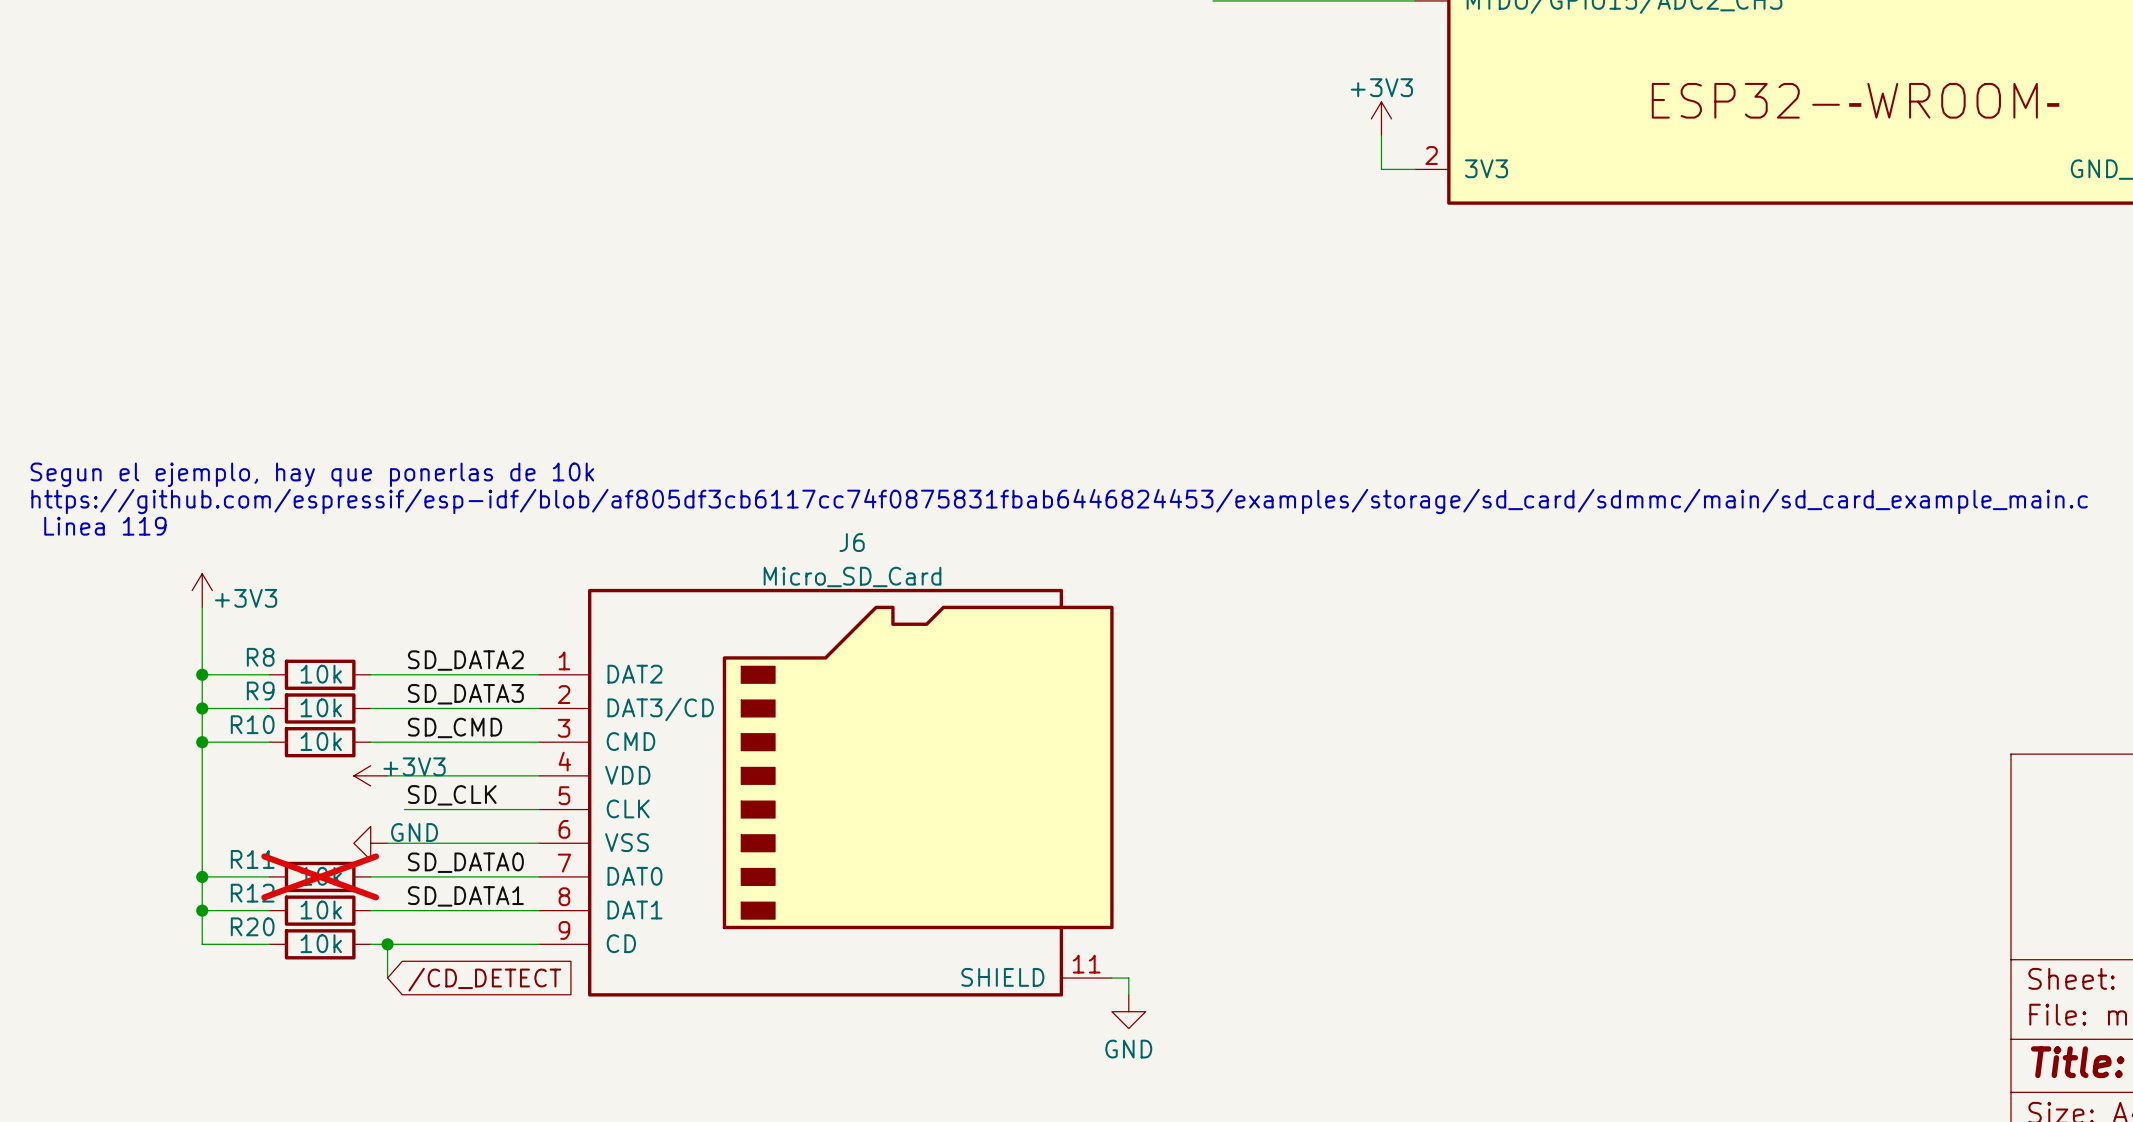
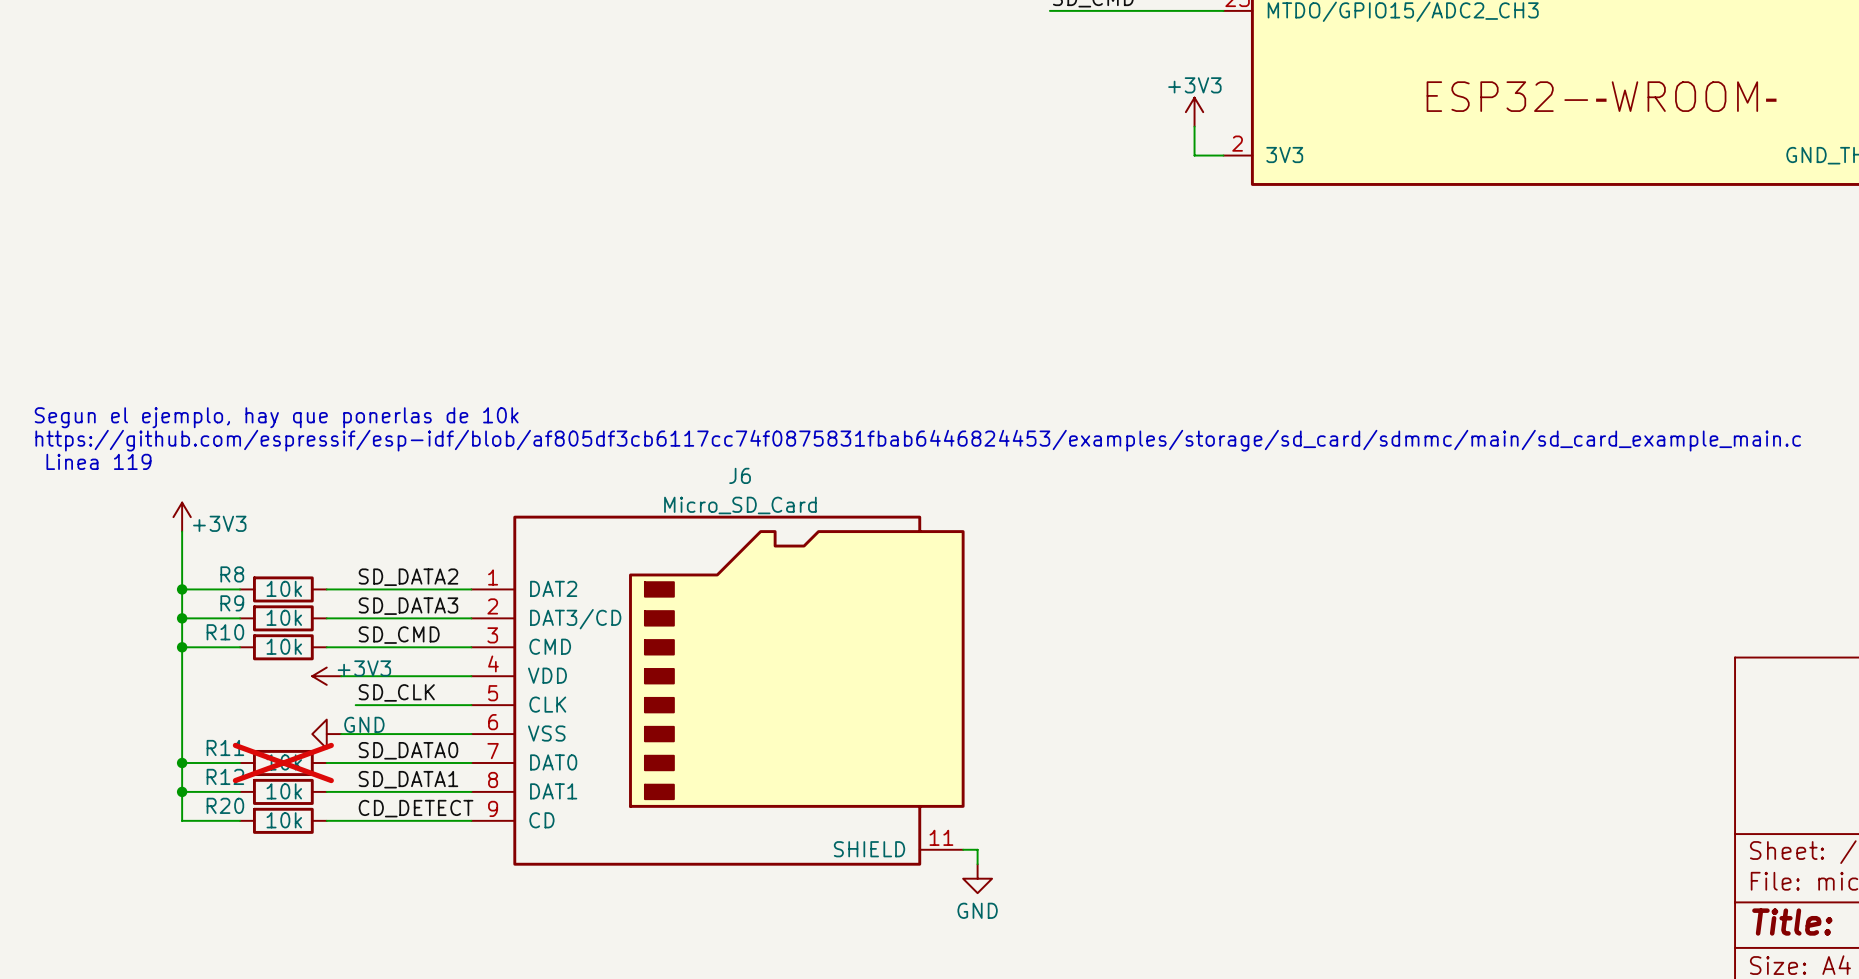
label: none -> CD_DETECT (416, 808)
wire: (387, 944) (387, 978) -> none
junction: (387, 944) -> none
global label: /CD_DETECT (484, 979) -> none

